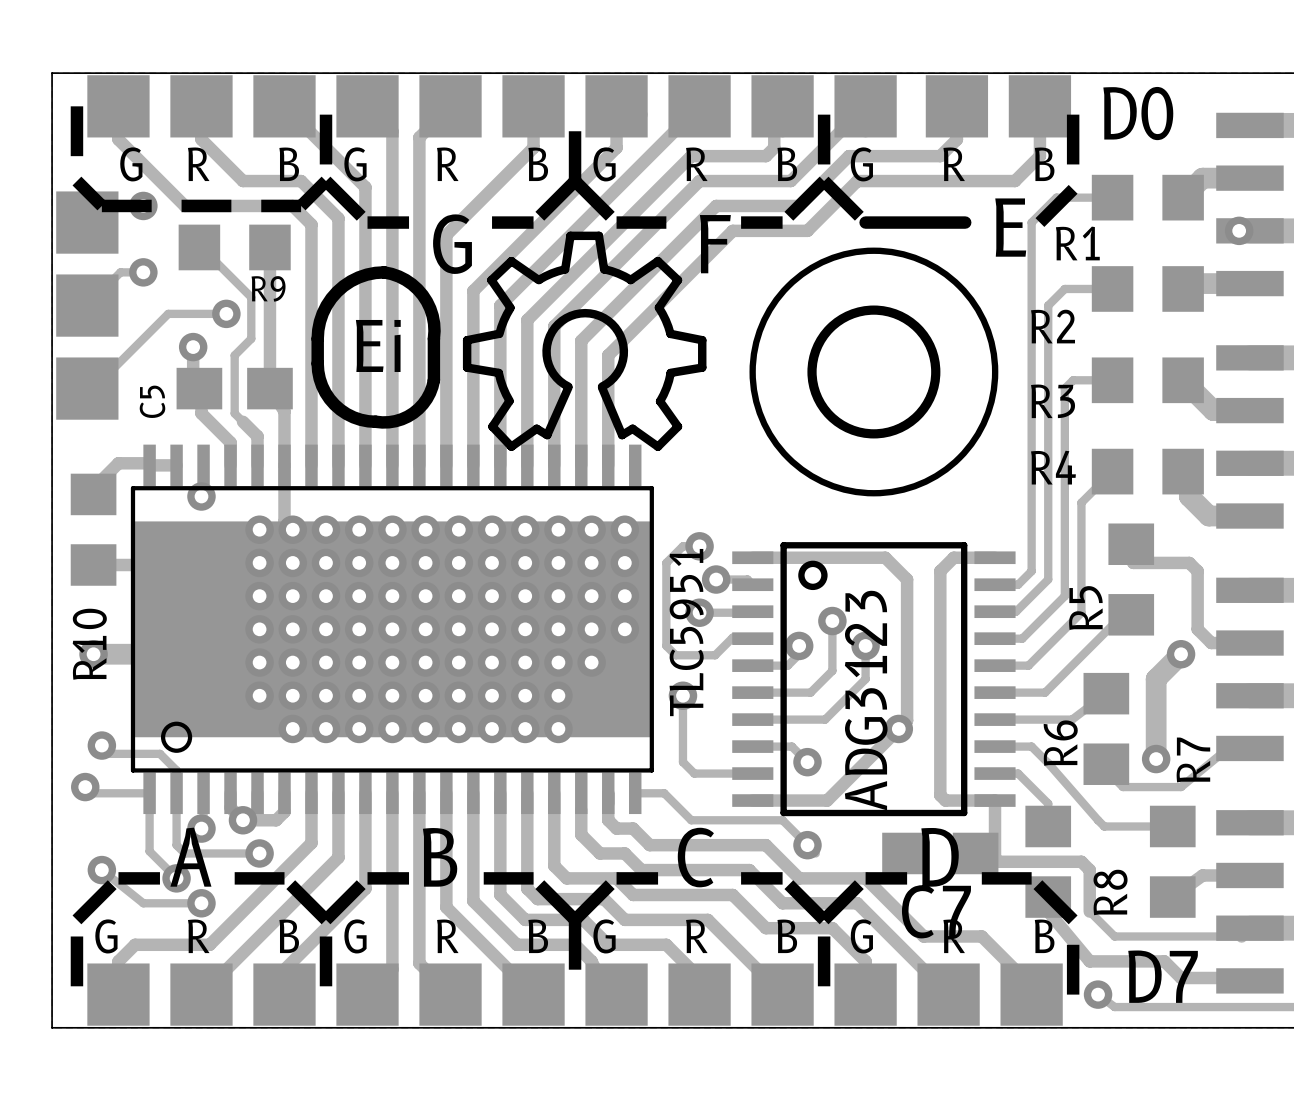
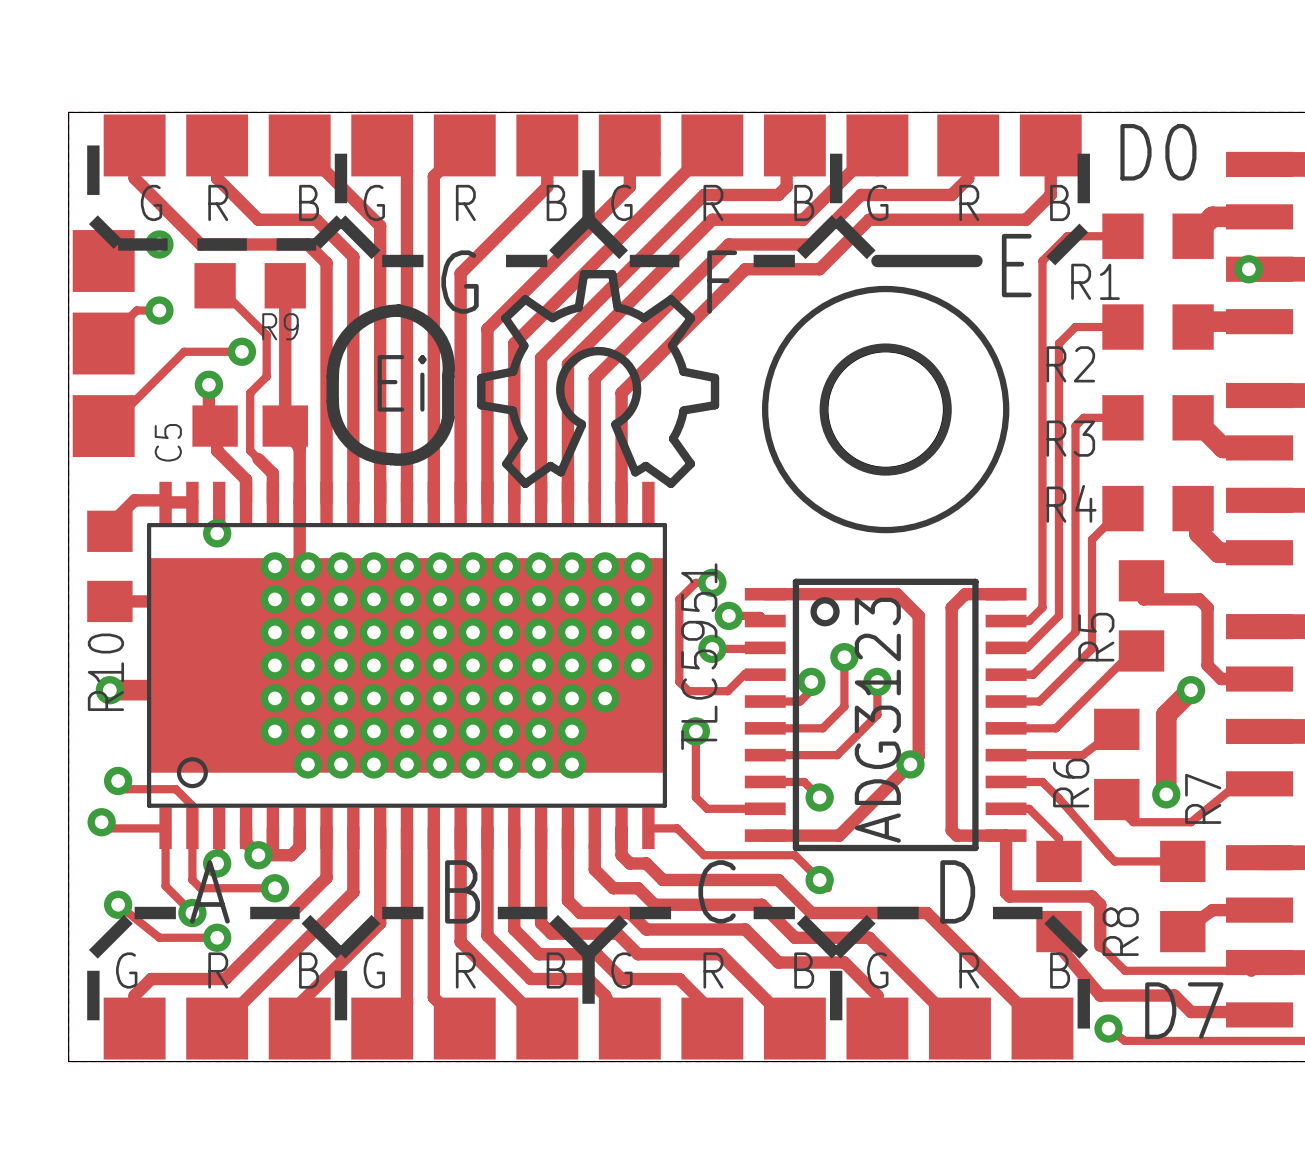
C7: (940, 853) -> none
track: (865, 878) (923, 936) (981, 936) (1031, 986) (1031, 994) -> (877, 913) (926, 913) (1042, 1028)

